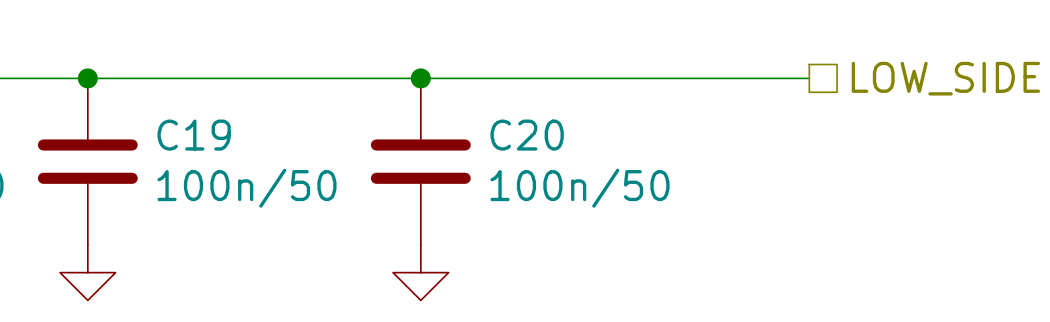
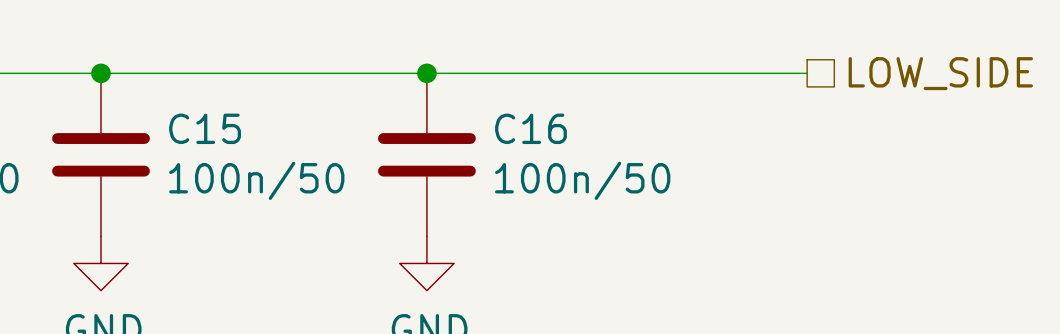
C19 name: C19 (194, 135) -> C15 (205, 128)
C20 name: C20 (527, 135) -> C16 (530, 128)

